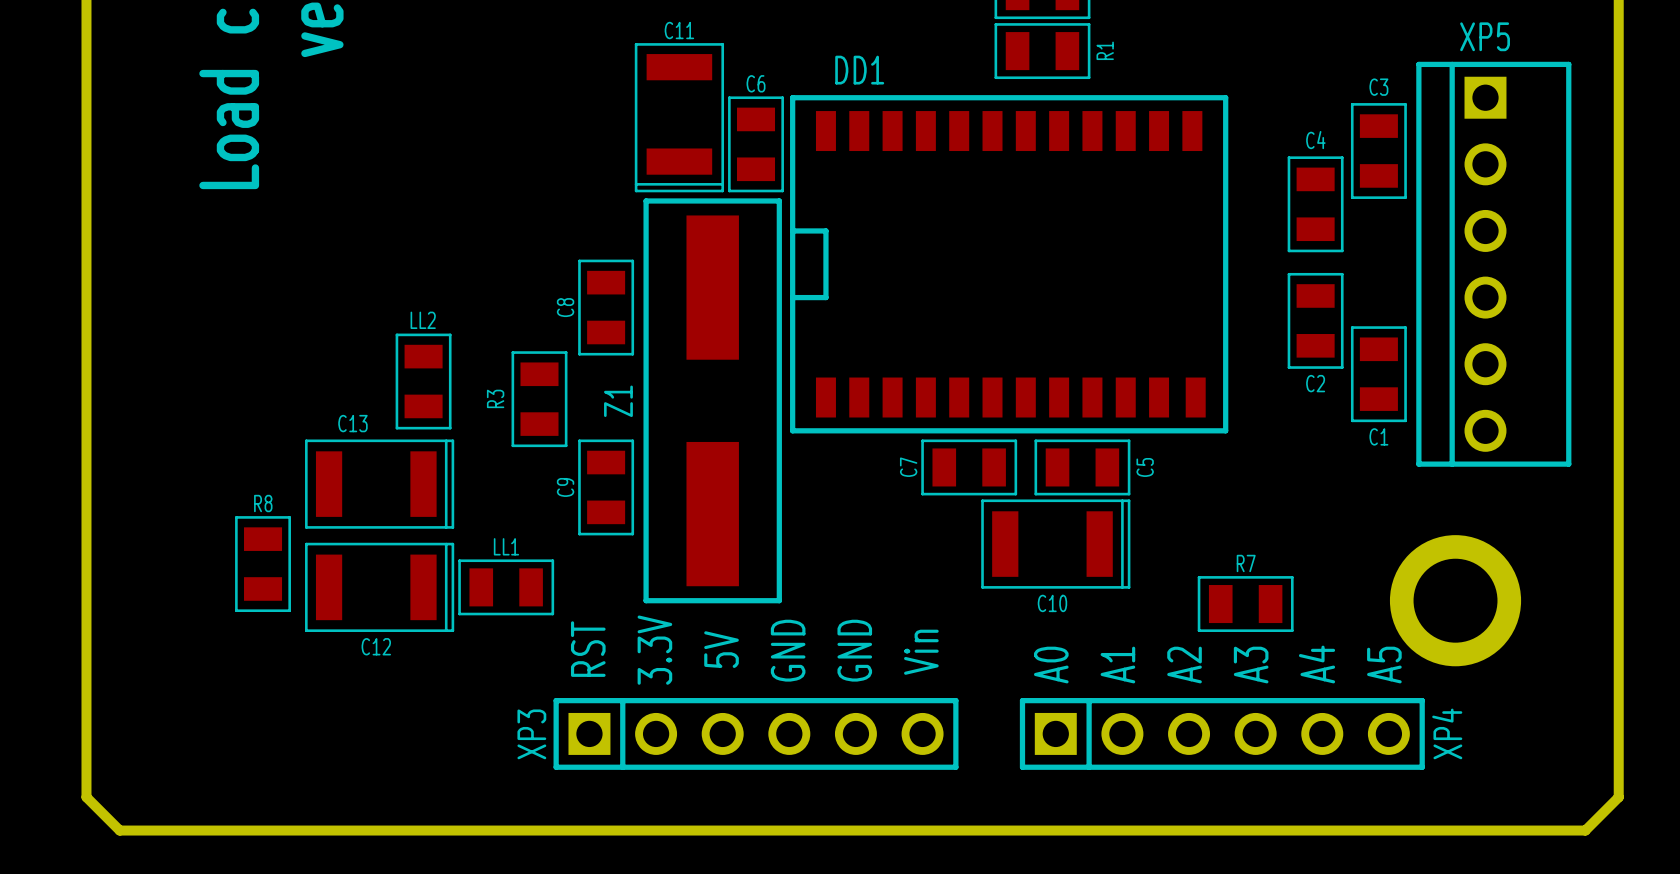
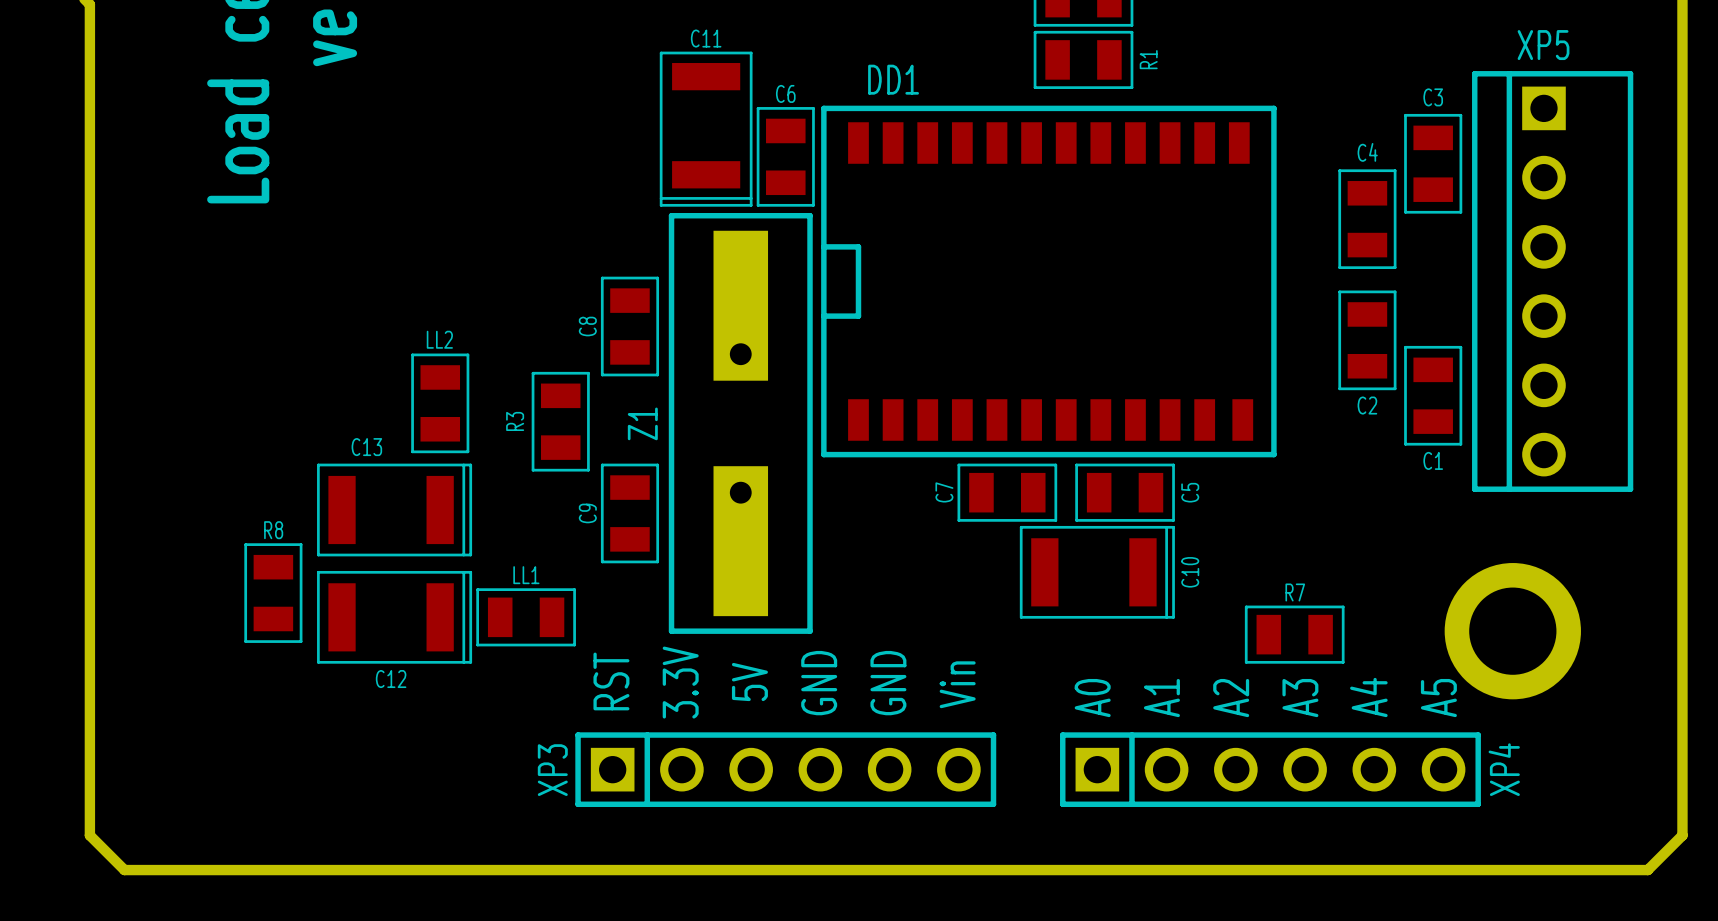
Z1 footprint: [643, 198, 782, 604] -> [668, 212, 813, 634]
C10 name rotation: 0° (1052, 603) -> 90° counterclockwise (1190, 572)
C10 name position: C10 (1052, 603) -> C10 (1190, 572)

